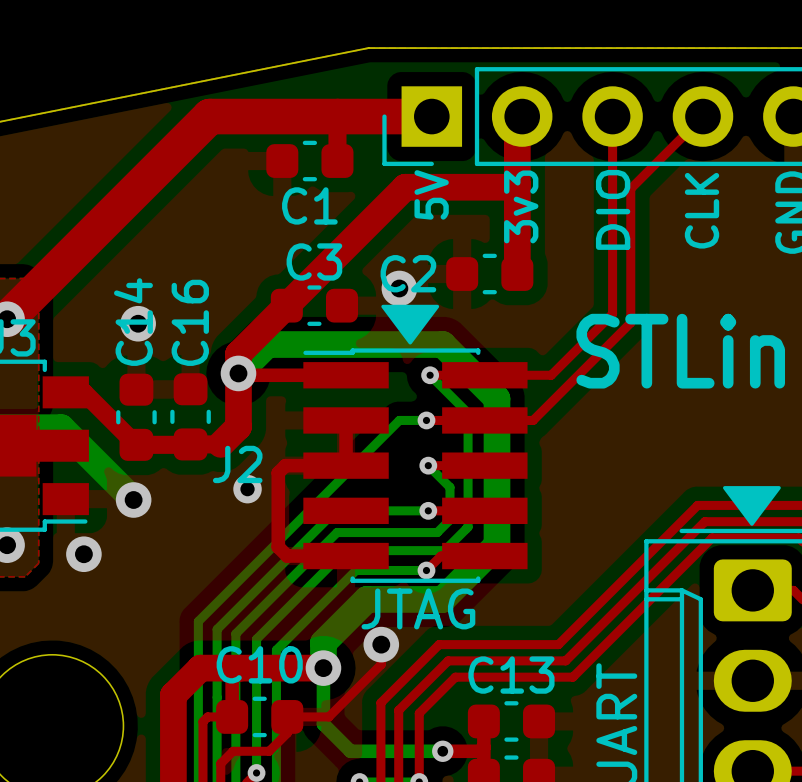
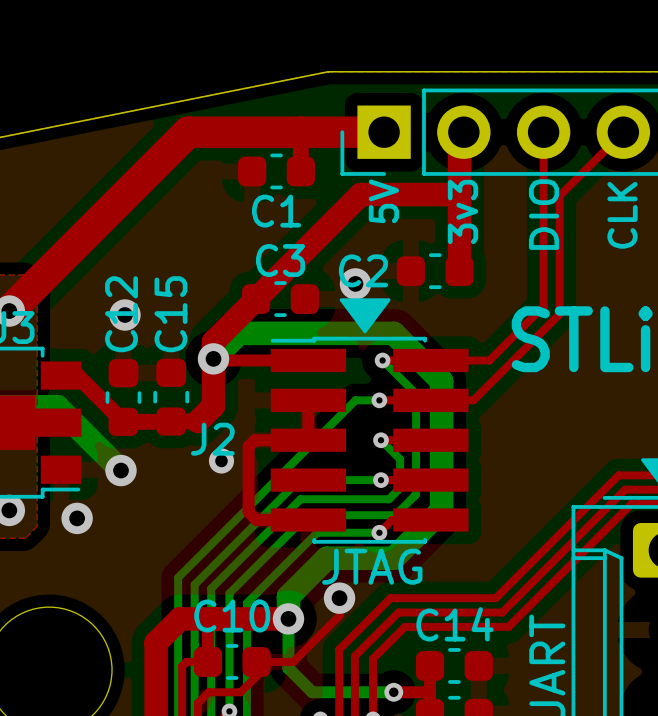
C14 name: C14 (133, 322) -> C12 (121, 314)
C16 name: C16 (190, 322) -> C15 (170, 314)
C13 name: C13 (511, 675) -> C14 (455, 624)

